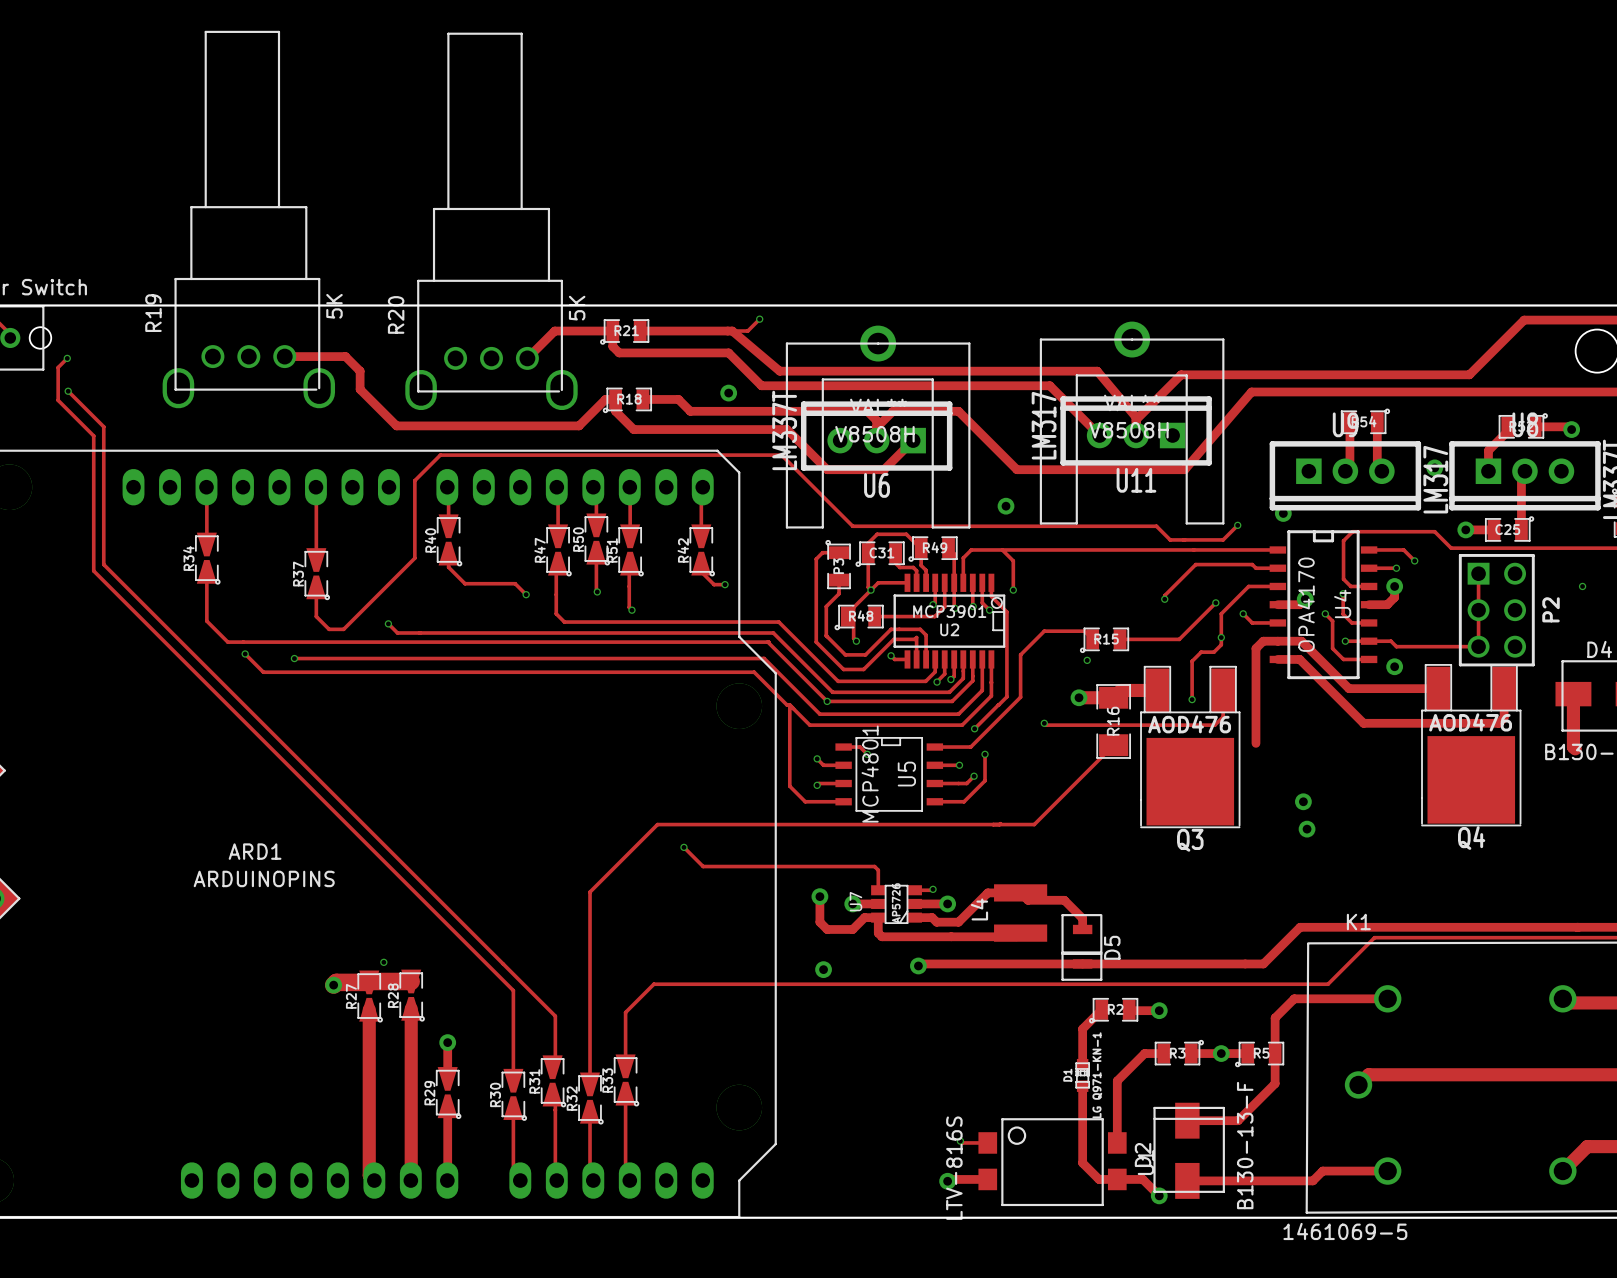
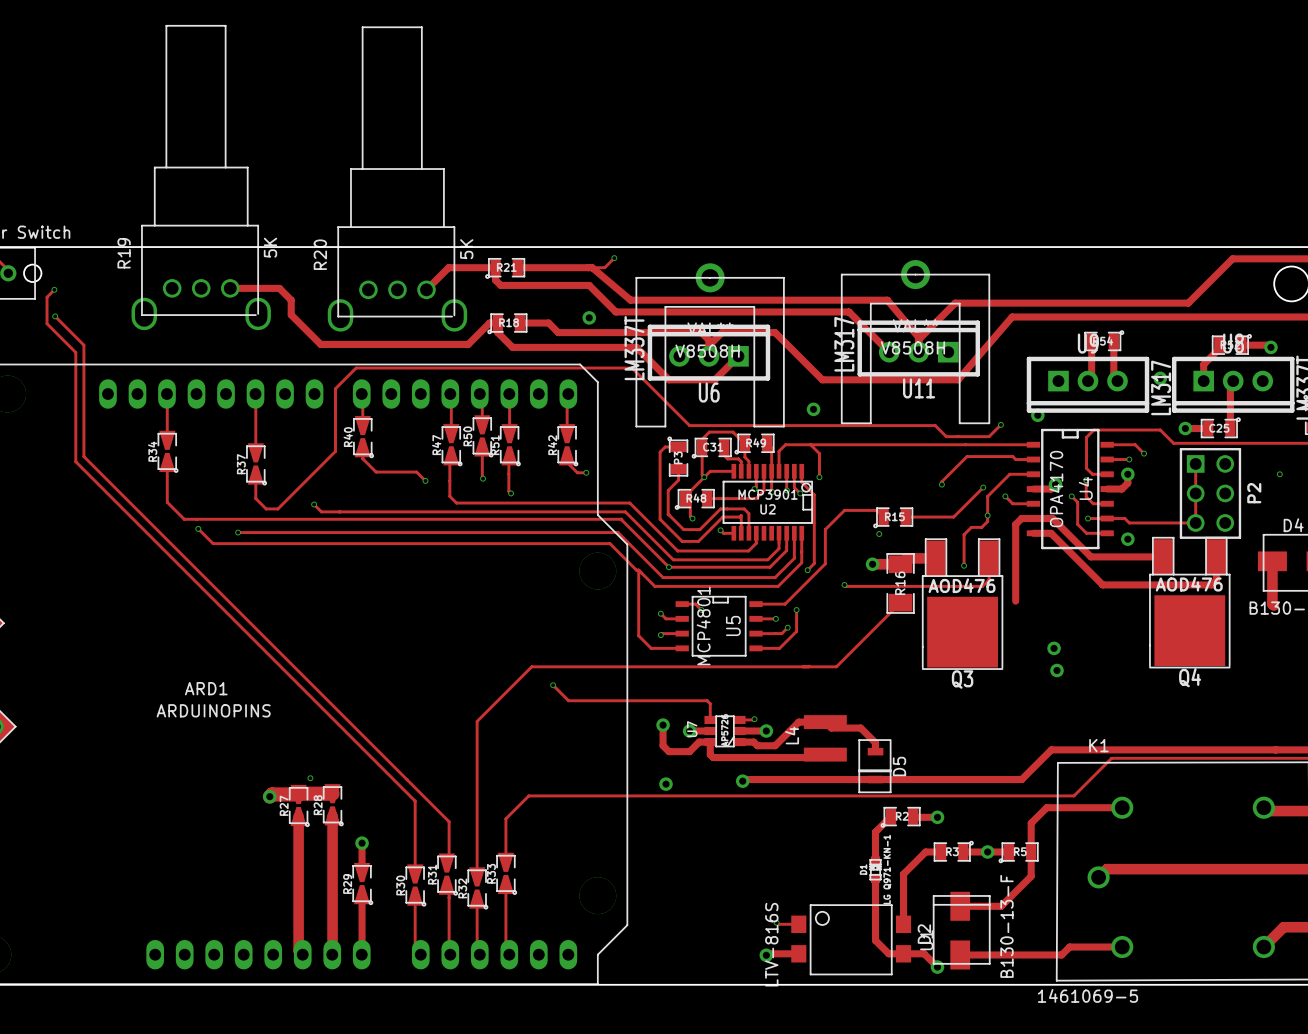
track: (944, 659) (944, 674) (937, 682) -> none
track: (954, 659) (954, 676) (950, 679) -> none
via: (950, 679) -> none
via: (937, 682) -> none
track: (998, 705) (974, 728) -> none
via: none -> (807, 570)
via: (974, 728) -> none

